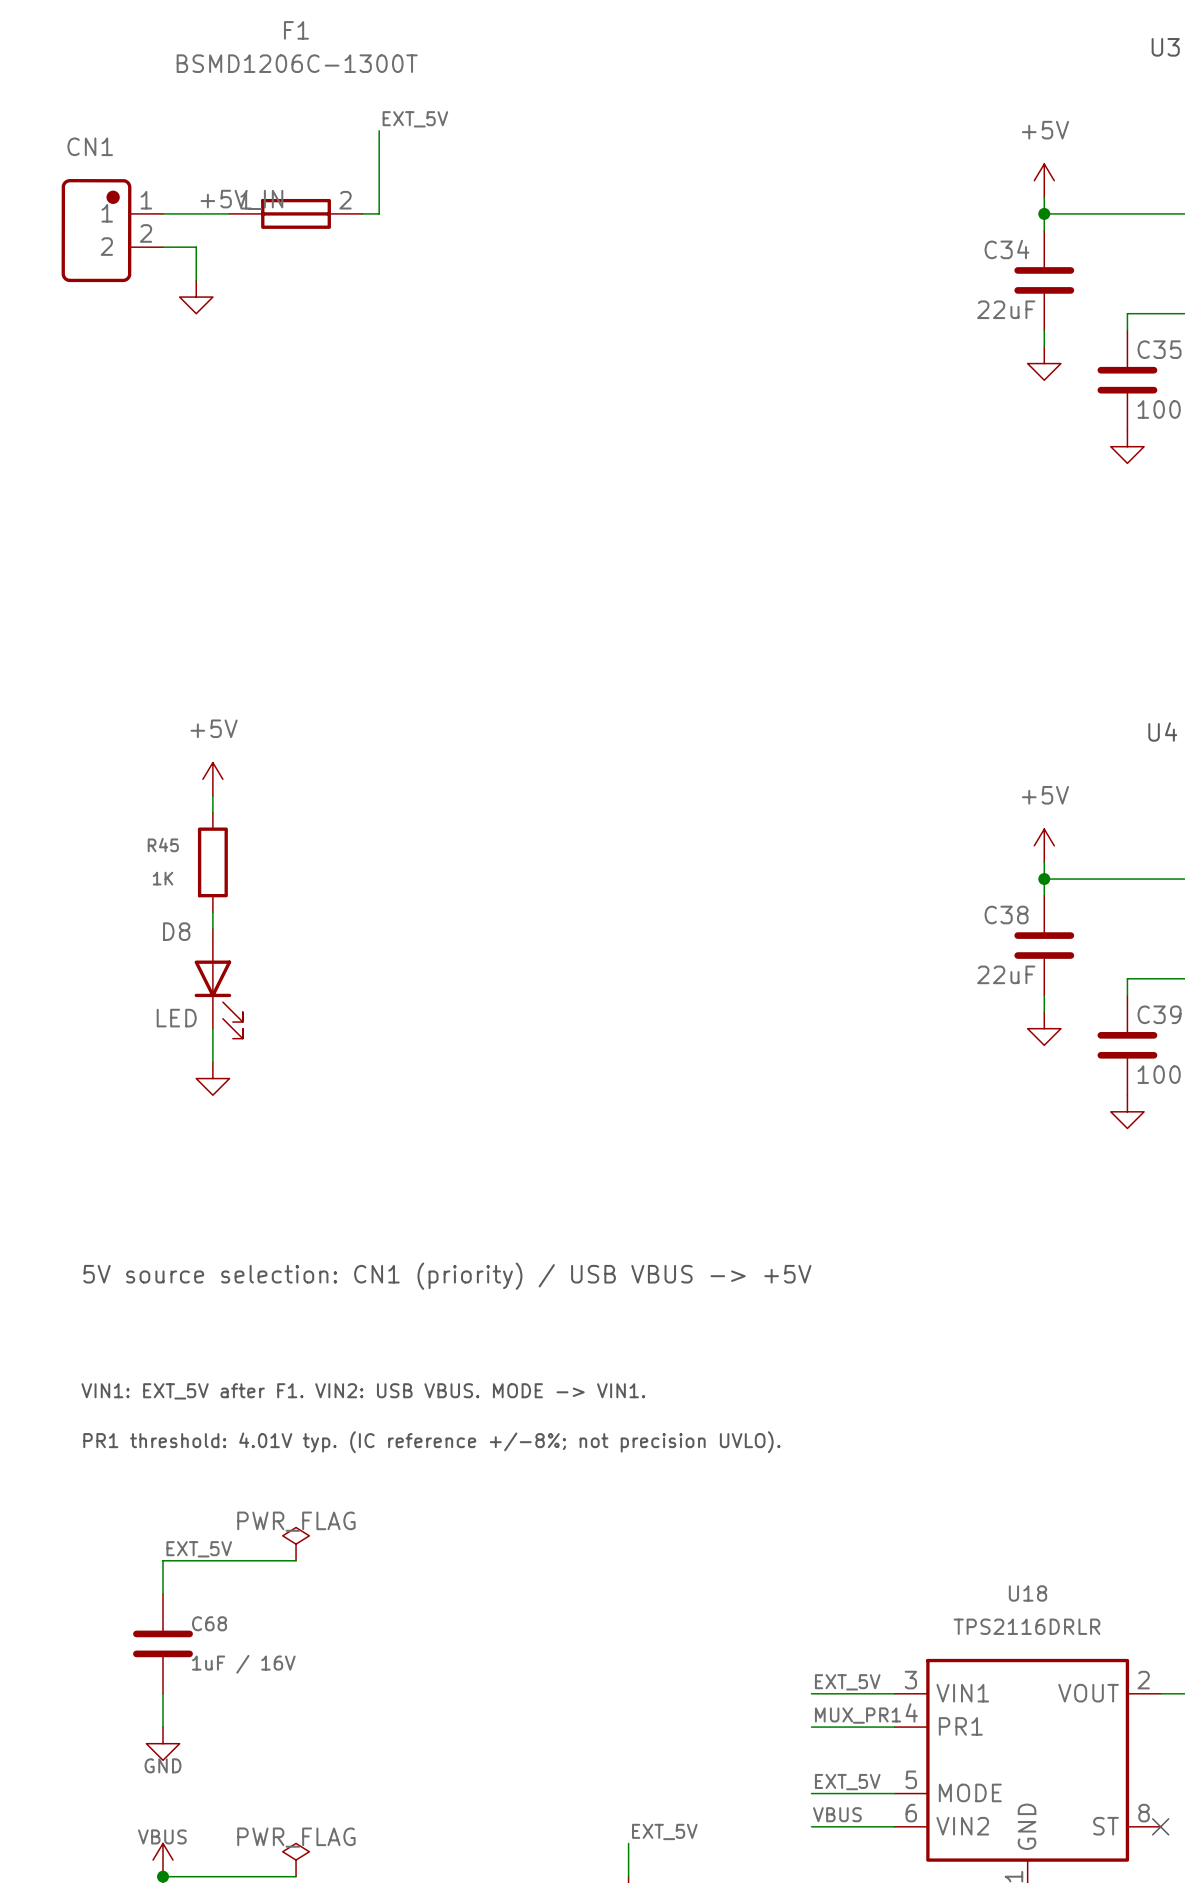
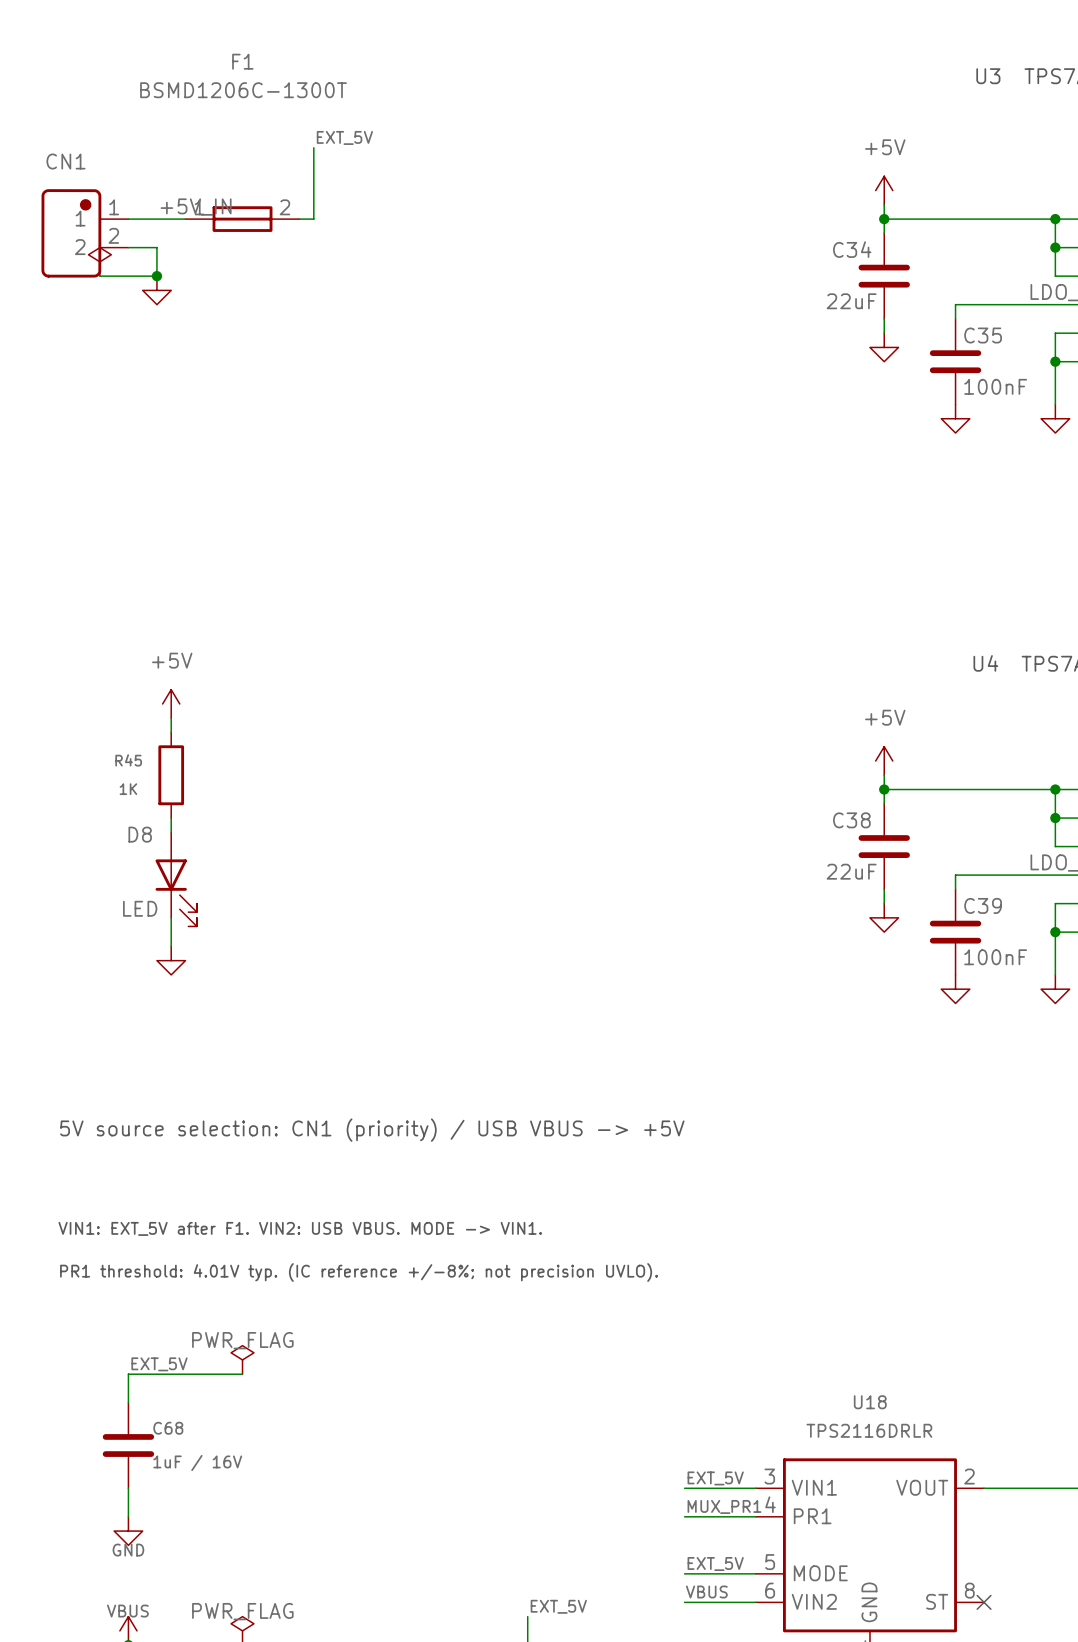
power symbol: none -> (99, 261)
wire: none -> (99, 276) (156, 276)
junction: none -> (156, 276)

